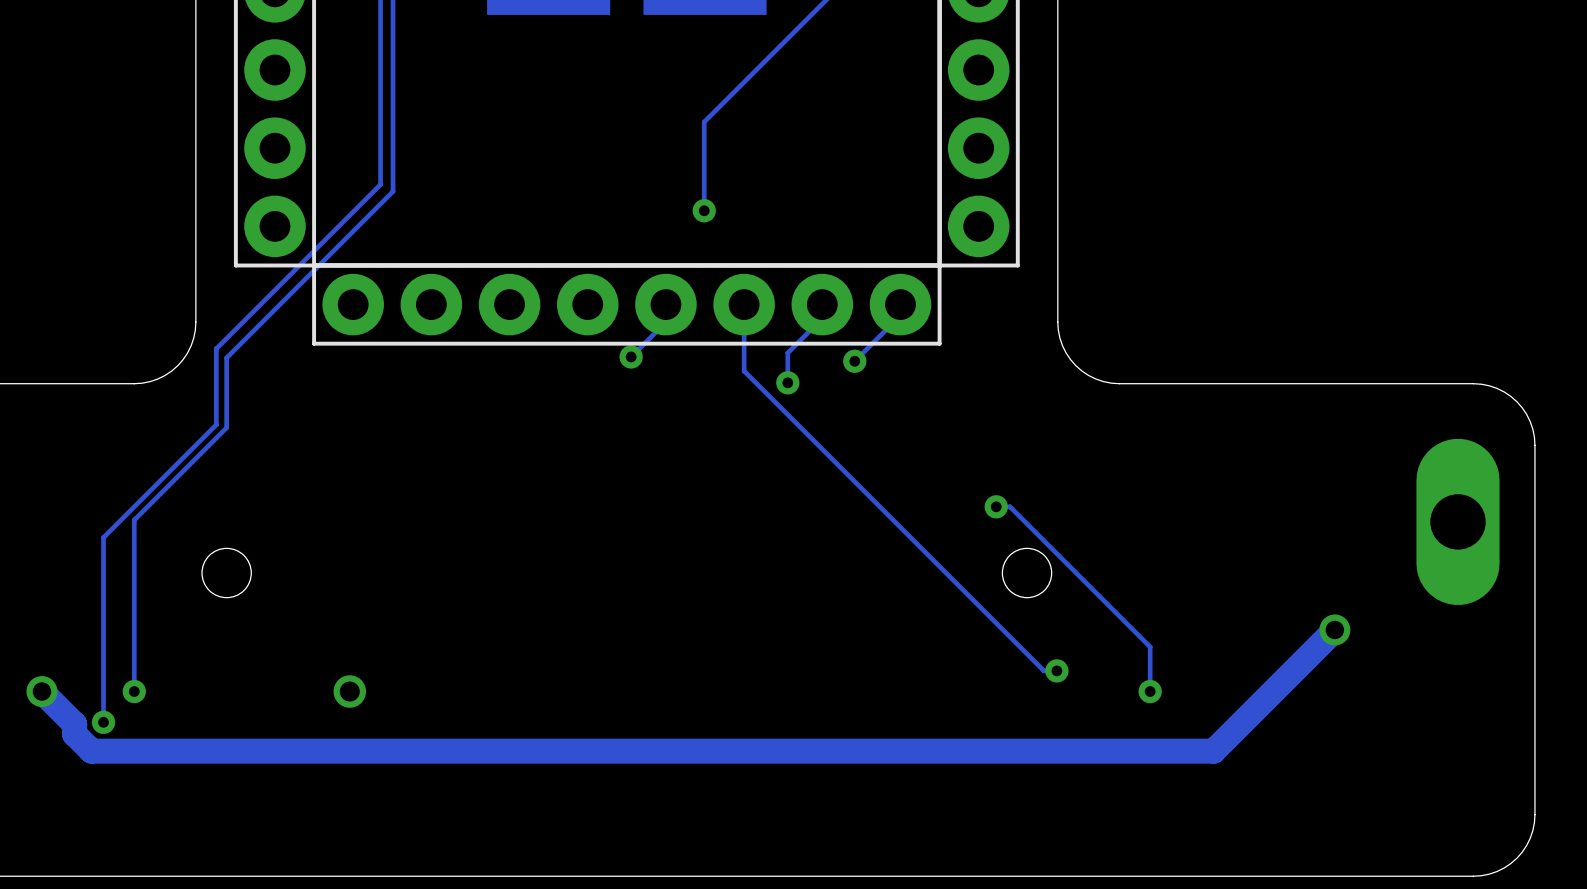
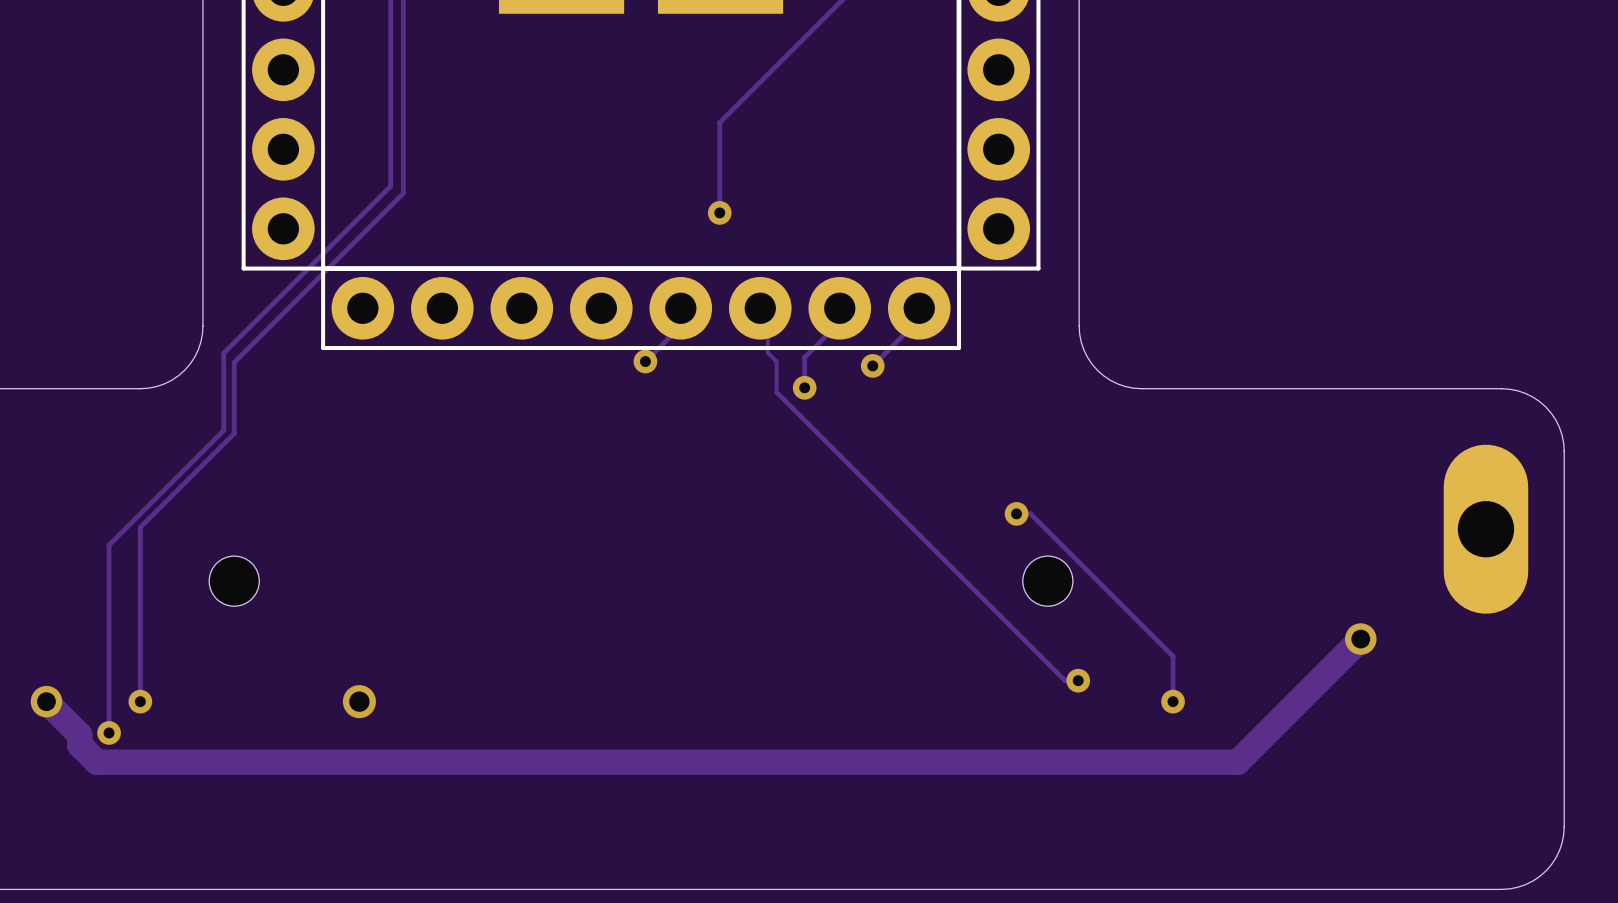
track: (744, 304) (744, 371) (760, 387) -> (760, 308) (767, 313) (767, 352) (776, 361) (776, 392)

